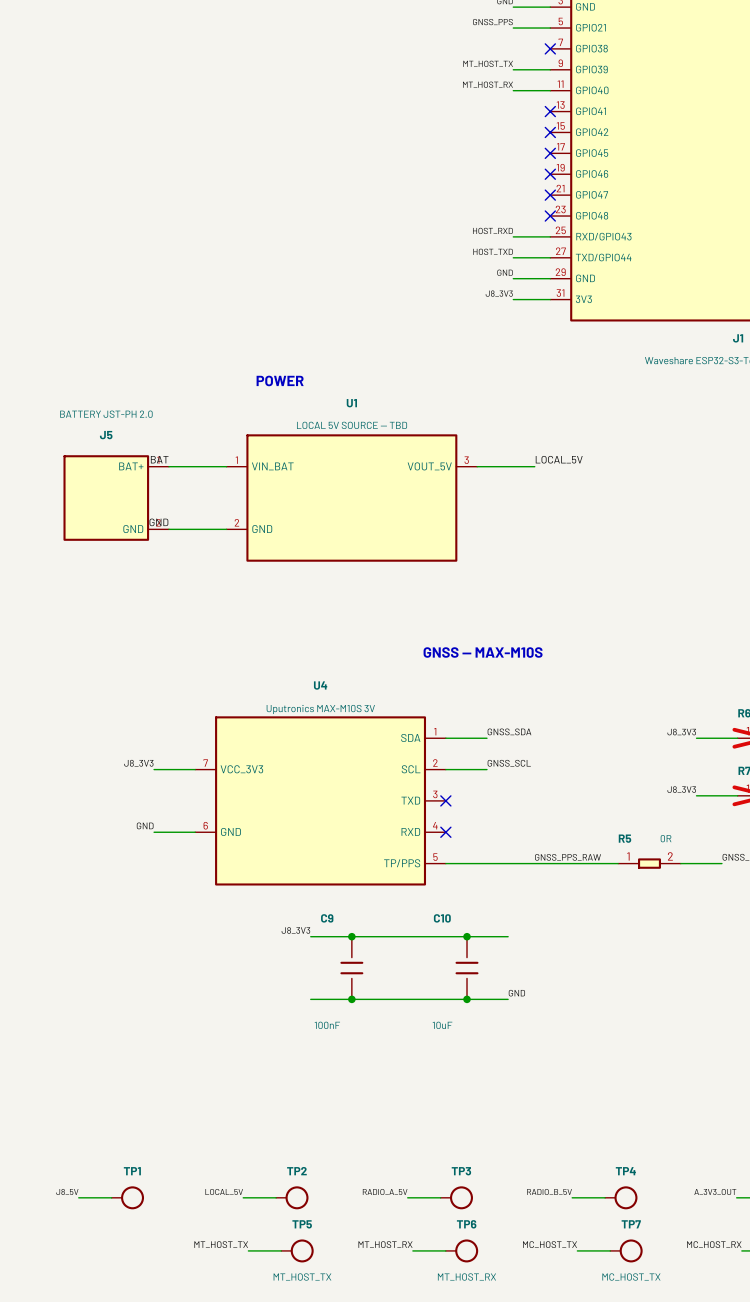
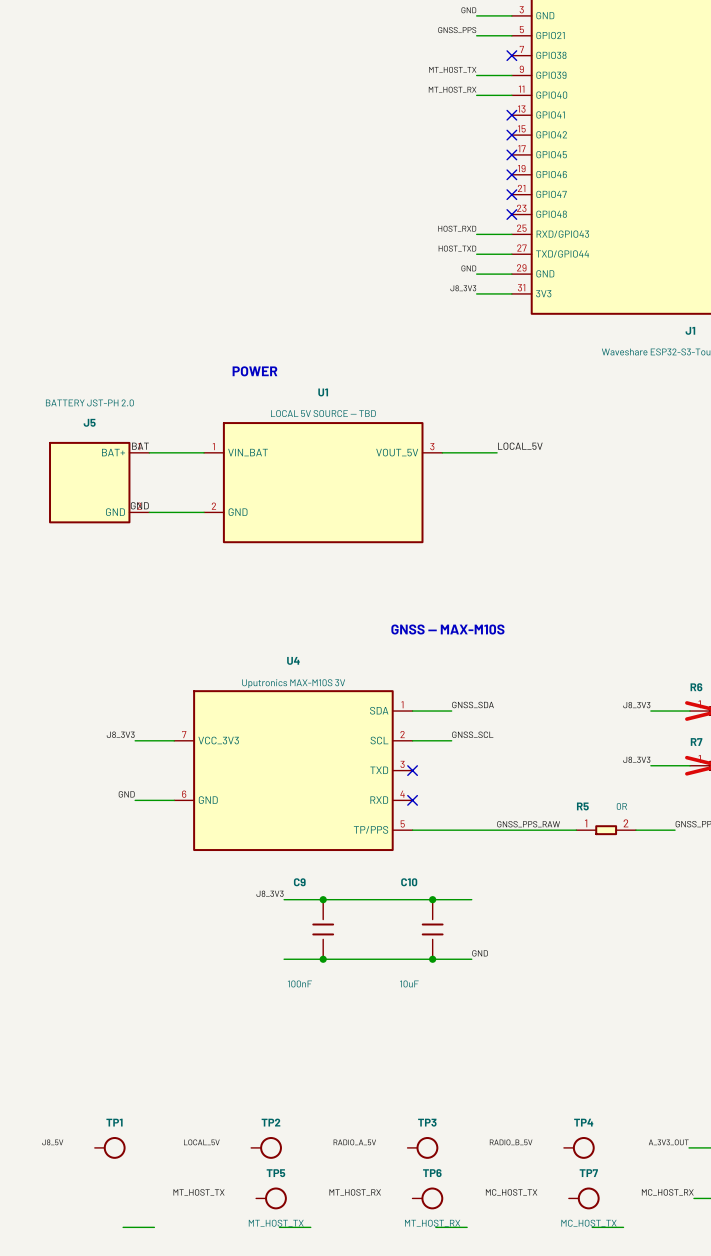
wire: (78, 1197) (111, 1197) -> (123, 1227) (154, 1227)
wire: (243, 1197) (276, 1197) -> (279, 1227) (310, 1227)
wire: (407, 1197) (440, 1197) -> (435, 1227) (467, 1227)
wire: (572, 1197) (605, 1197) -> (592, 1227) (623, 1227)
wire: (248, 1250) (281, 1250) -> none
wire: (412, 1250) (445, 1250) -> none
wire: (577, 1250) (610, 1250) -> none

